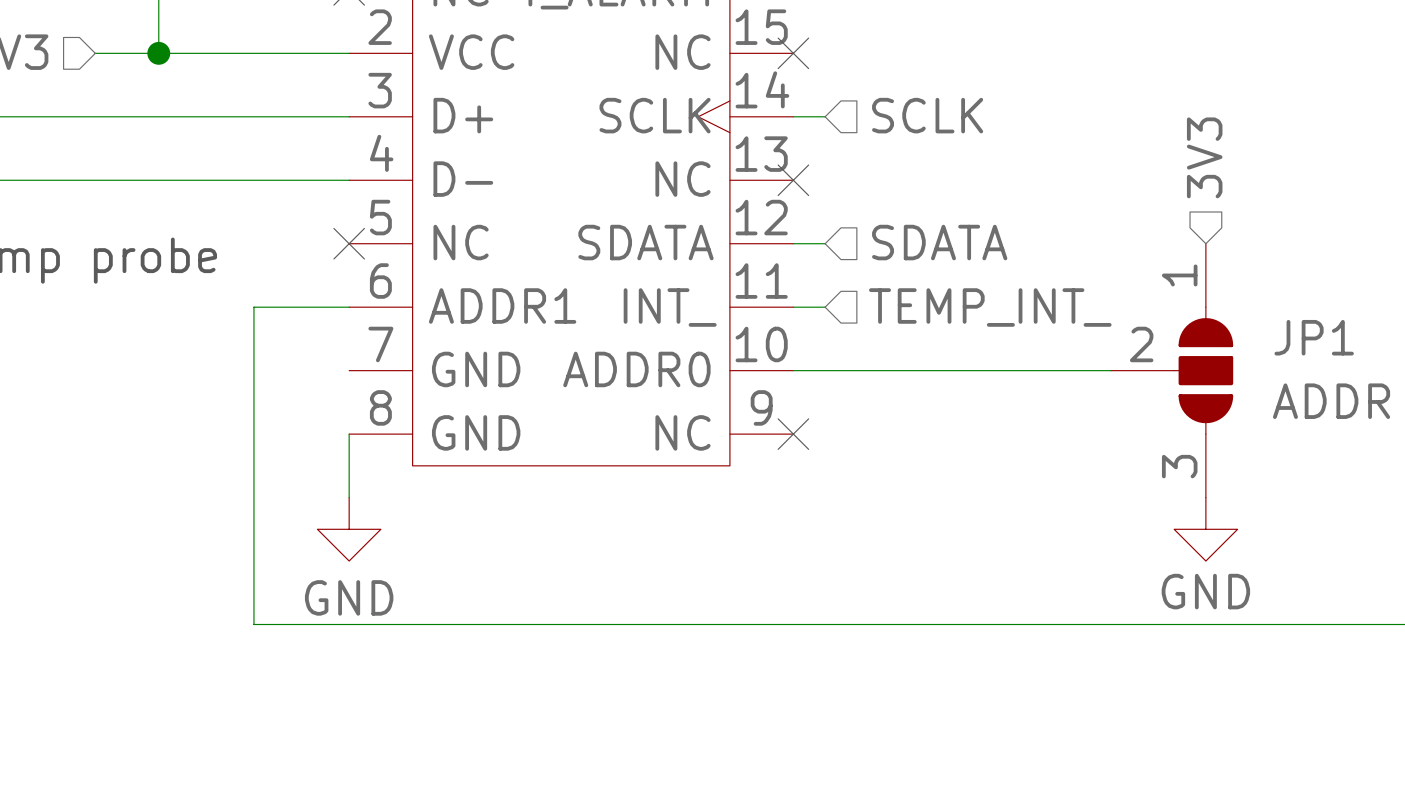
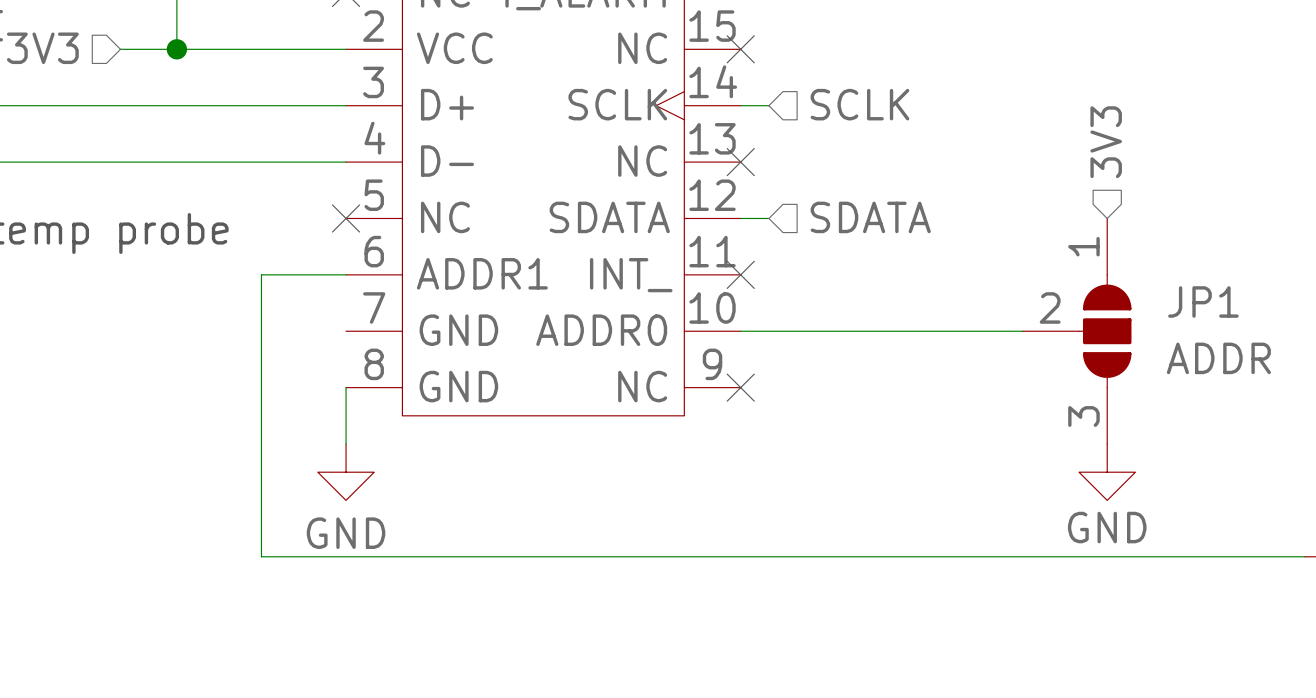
wire: (793, 307) (825, 307) -> none
no-connect mark: none -> (740, 274)
hierarchical label: TEMP_INT_ (990, 307) -> none

